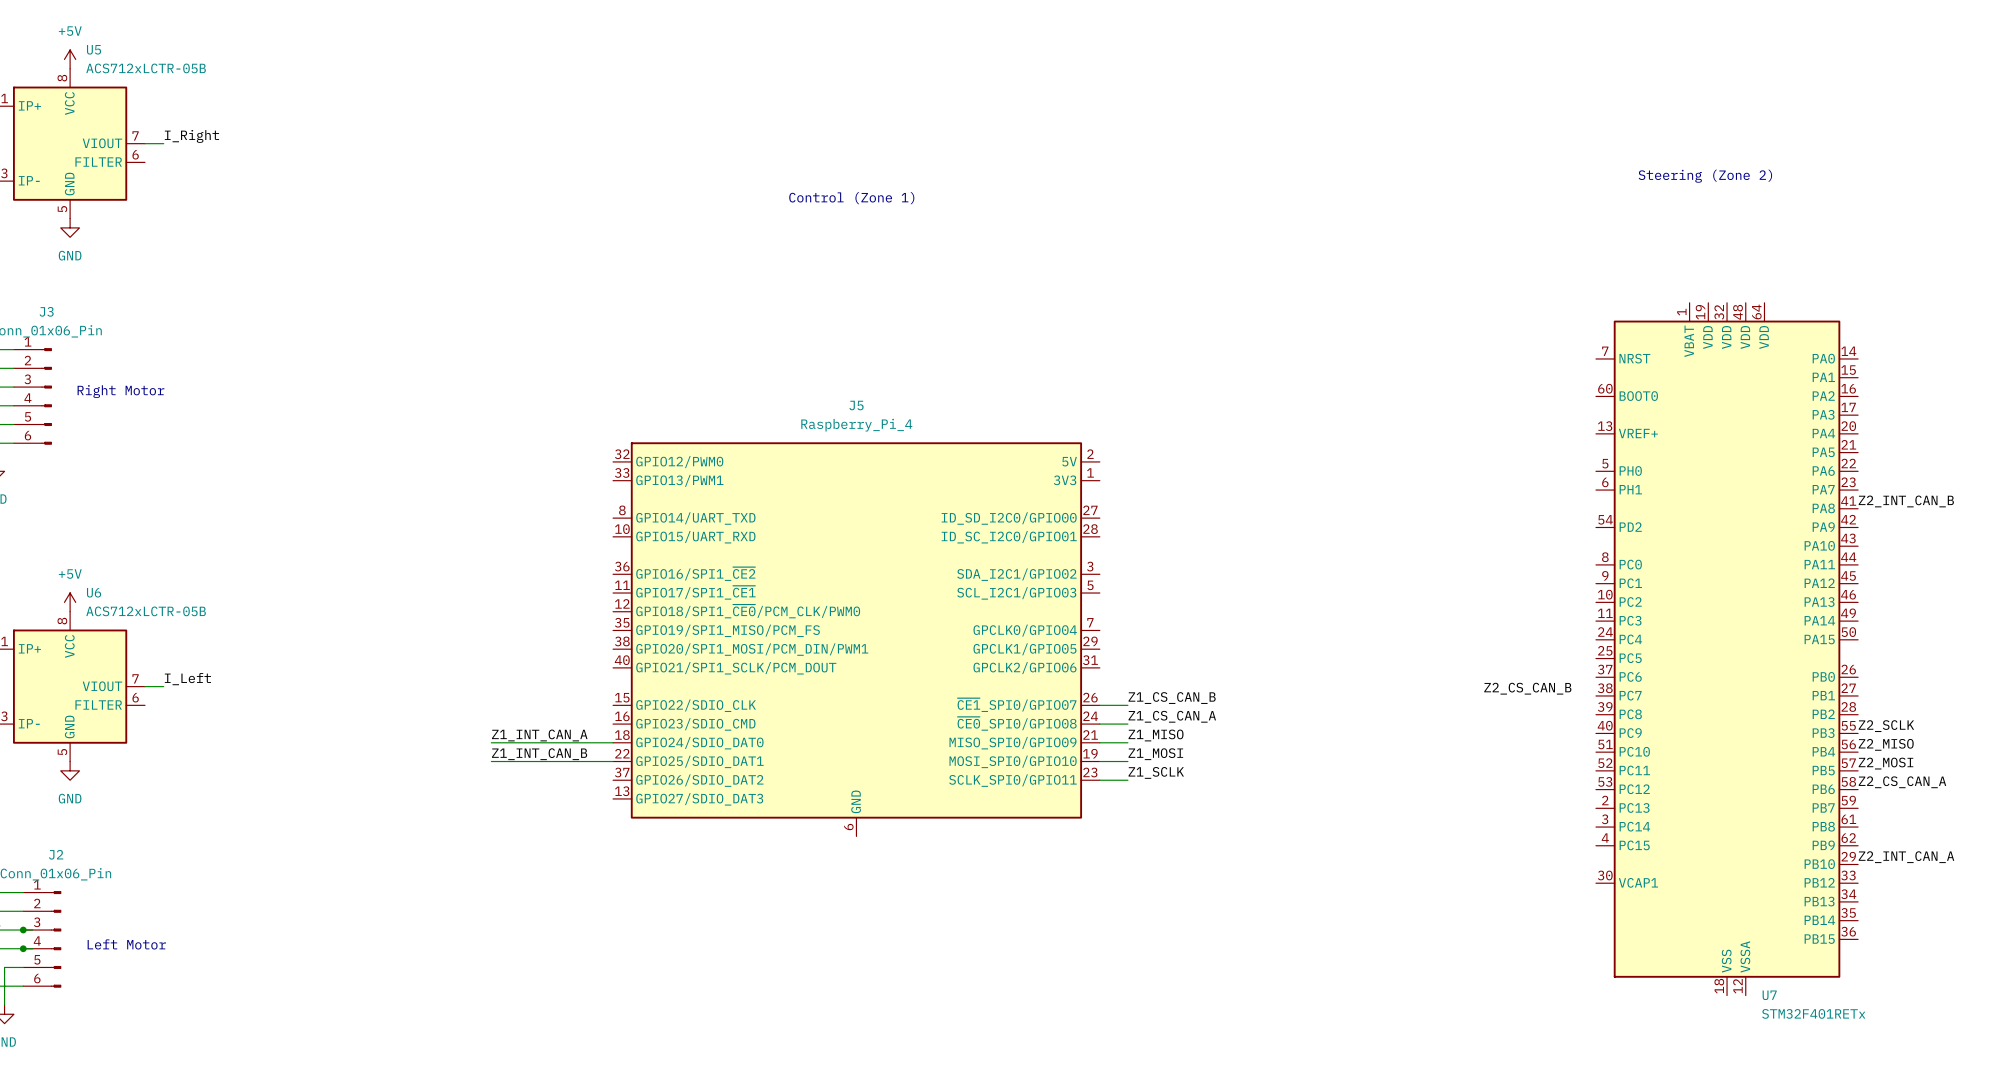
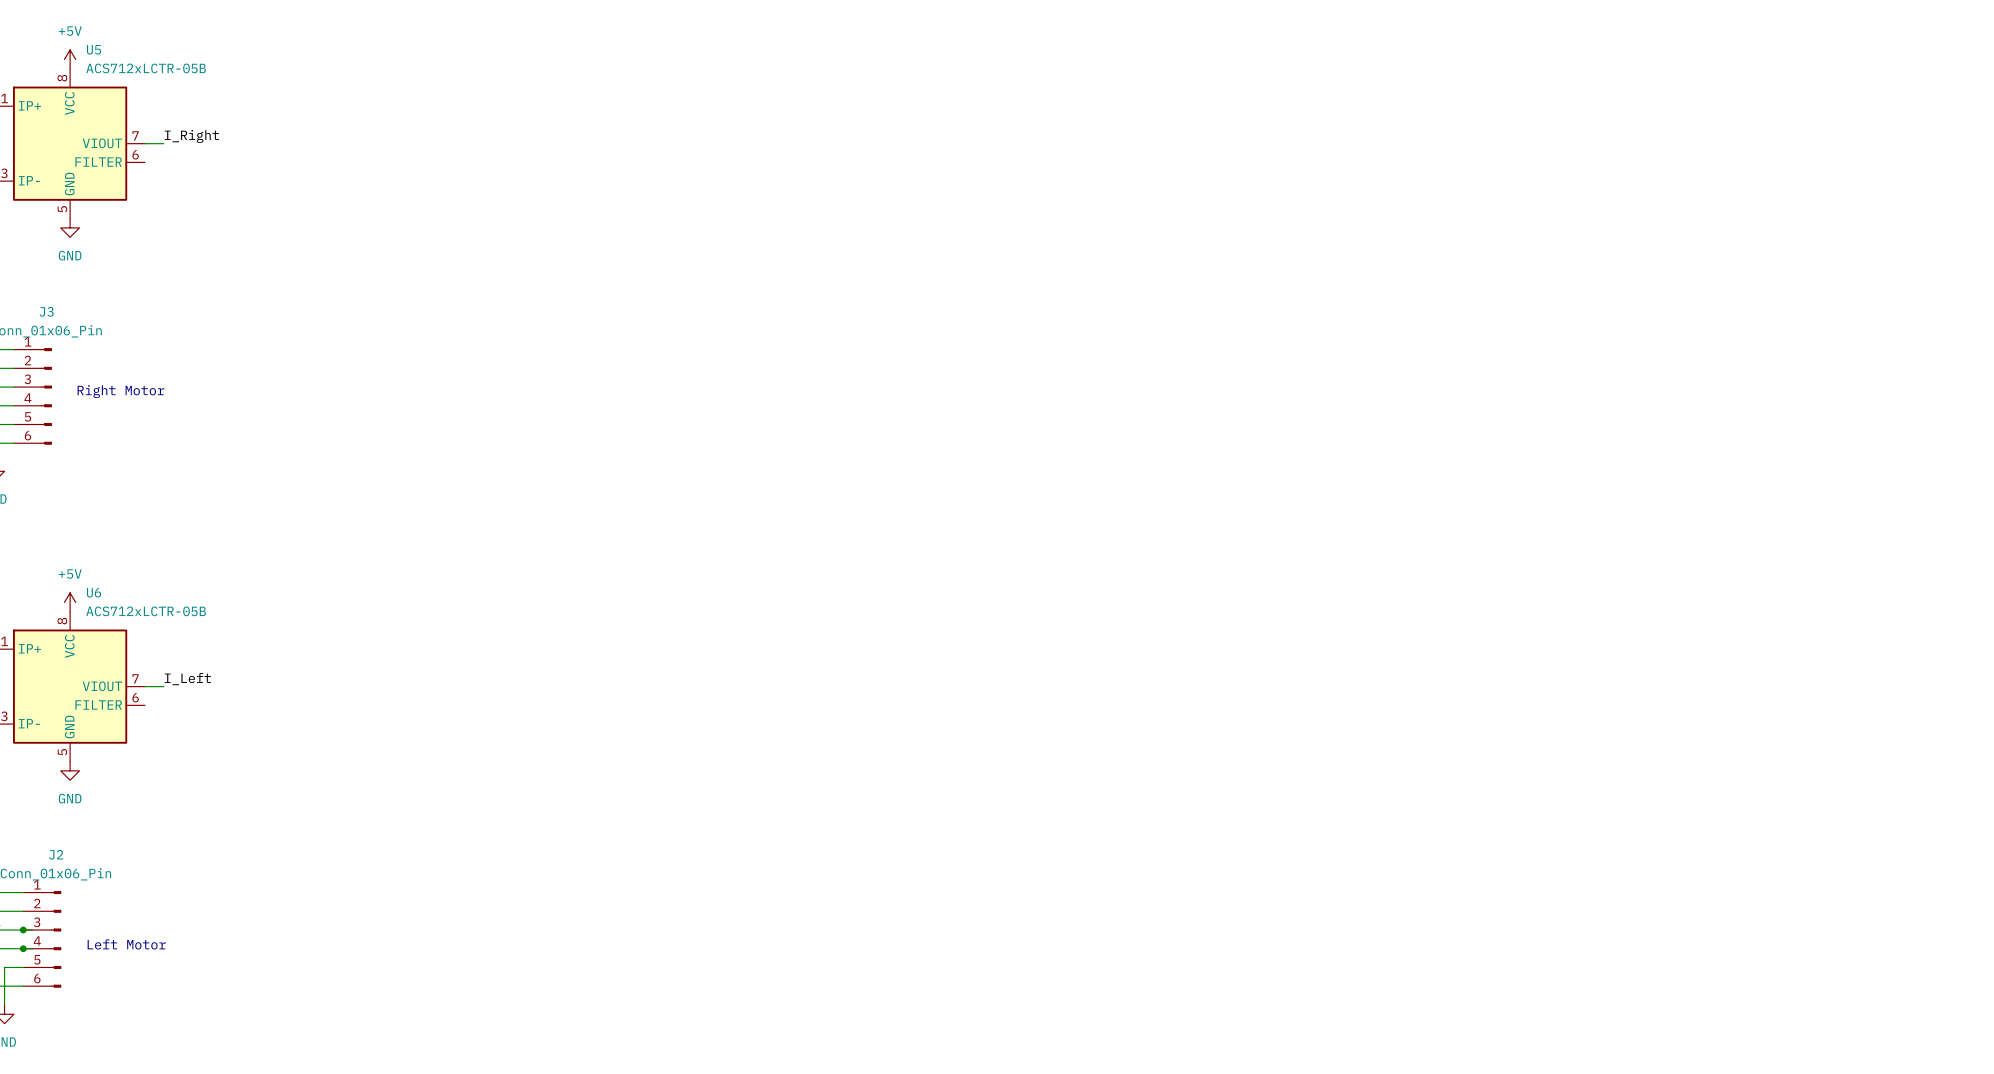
text: Steering (Zone 2) (1705, 176) -> none
text: Control (Zone 1) (851, 198) -> none
label: Z2_INT_CAN_B (1906, 501) -> none
J5: Raspberry_Pi_4 (856, 639) -> none
U7: STM32F401RETx (1727, 649) -> none
label: Z2_CS_CAN_B (1527, 688) -> none
label: Z1_CS_CAN_B (1172, 698) -> none
wire: (1099, 705) (1127, 705) -> none
label: Z1_CS_CAN_A (1172, 716) -> none
wire: (1099, 724) (1127, 724) -> none
label: Z2_SCLK (1886, 726) -> none
label: Z1_INT_CAN_A (539, 735) -> none
label: Z1_MISO (1156, 735) -> none
wire: (491, 742) (613, 742) -> none
wire: (1099, 742) (1127, 742) -> none
label: Z2_MISO (1886, 744) -> none
label: Z1_INT_CAN_B (539, 754) -> none
label: Z1_MOSI (1155, 754) -> none
wire: (491, 761) (613, 761) -> none
wire: (1099, 761) (1127, 761) -> none
label: Z2_MOSI (1886, 763) -> none
label: Z1_SCLK (1156, 772) -> none
wire: (1099, 780) (1127, 780) -> none
label: Z2_CS_CAN_A (1902, 782) -> none
label: Z2_INT_CAN_A (1906, 857) -> none

